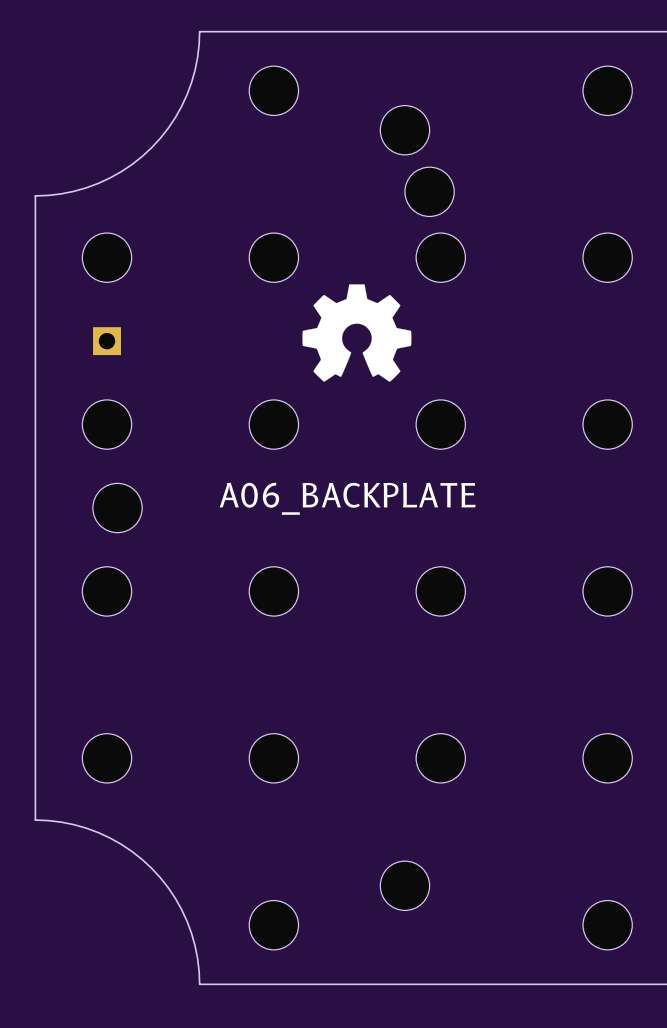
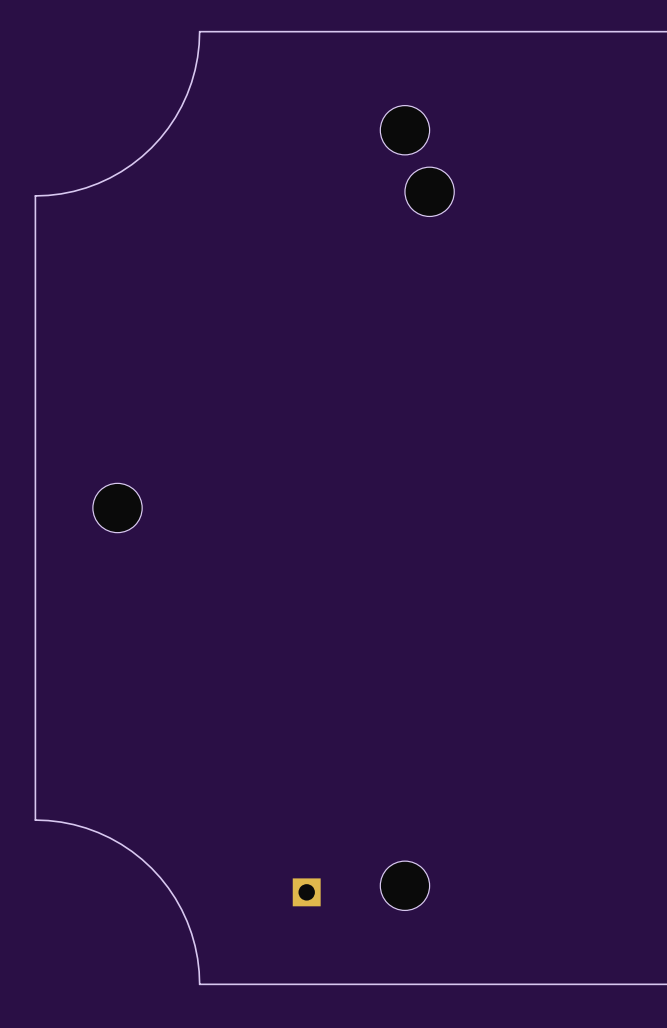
part: (273, 90) -> none
part: (607, 90) -> none
part: (107, 257) -> none
part: (273, 257) -> none
part: (440, 257) -> none
part: (607, 257) -> none
drawing: [302, 284, 412, 382] -> none
part: (107, 341) -> none
part: (107, 424) -> none
part: (273, 424) -> none
part: (440, 424) -> none
part: (607, 424) -> none
text: A06_BACKPLATE (347, 498) -> none
part: (107, 591) -> none
part: (273, 591) -> none
part: (440, 591) -> none
part: (607, 591) -> none
part: (107, 758) -> none
part: (273, 758) -> none
part: (440, 758) -> none
part: (607, 758) -> none
part: none -> (306, 892)
part: (273, 925) -> none
part: (607, 925) -> none

